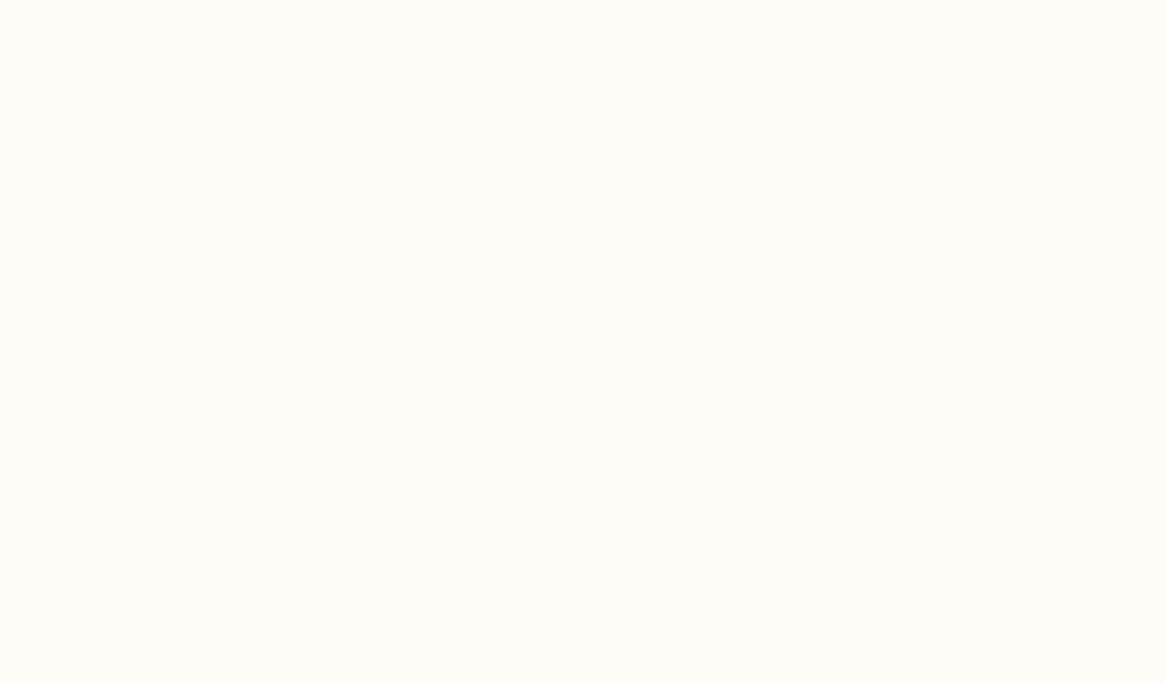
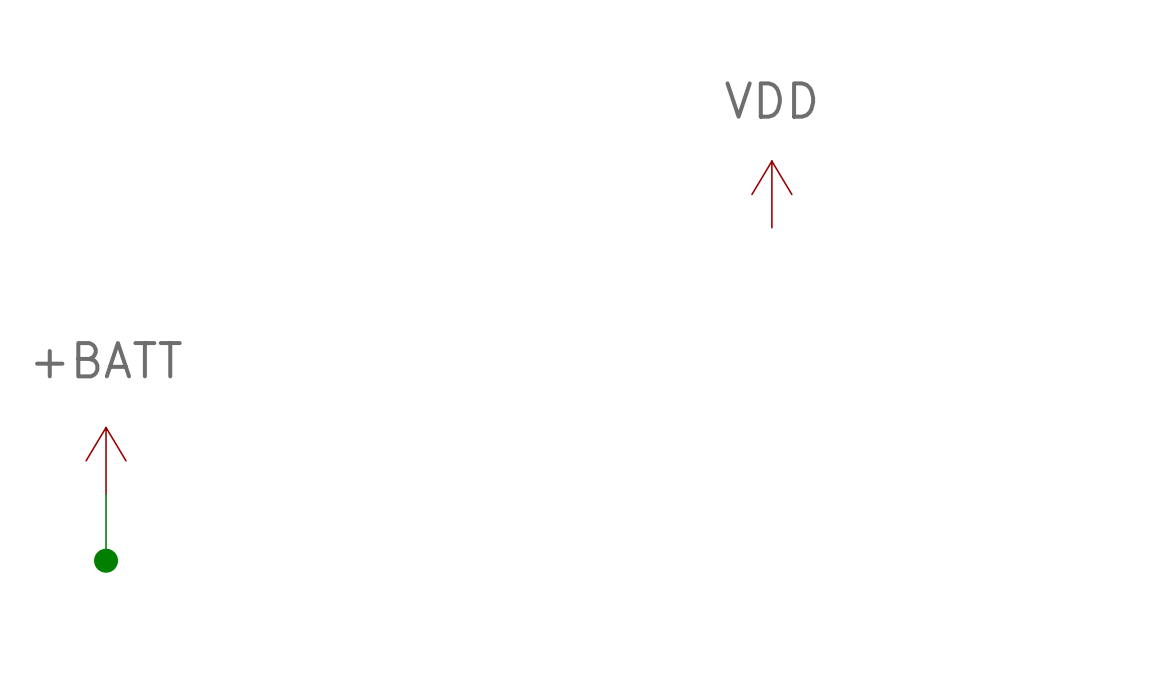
power symbol: none -> VDD (771, 194)
power symbol: none -> +BATT (106, 460)
wire: none -> (106, 494) (106, 560)
junction: none -> (106, 560)

